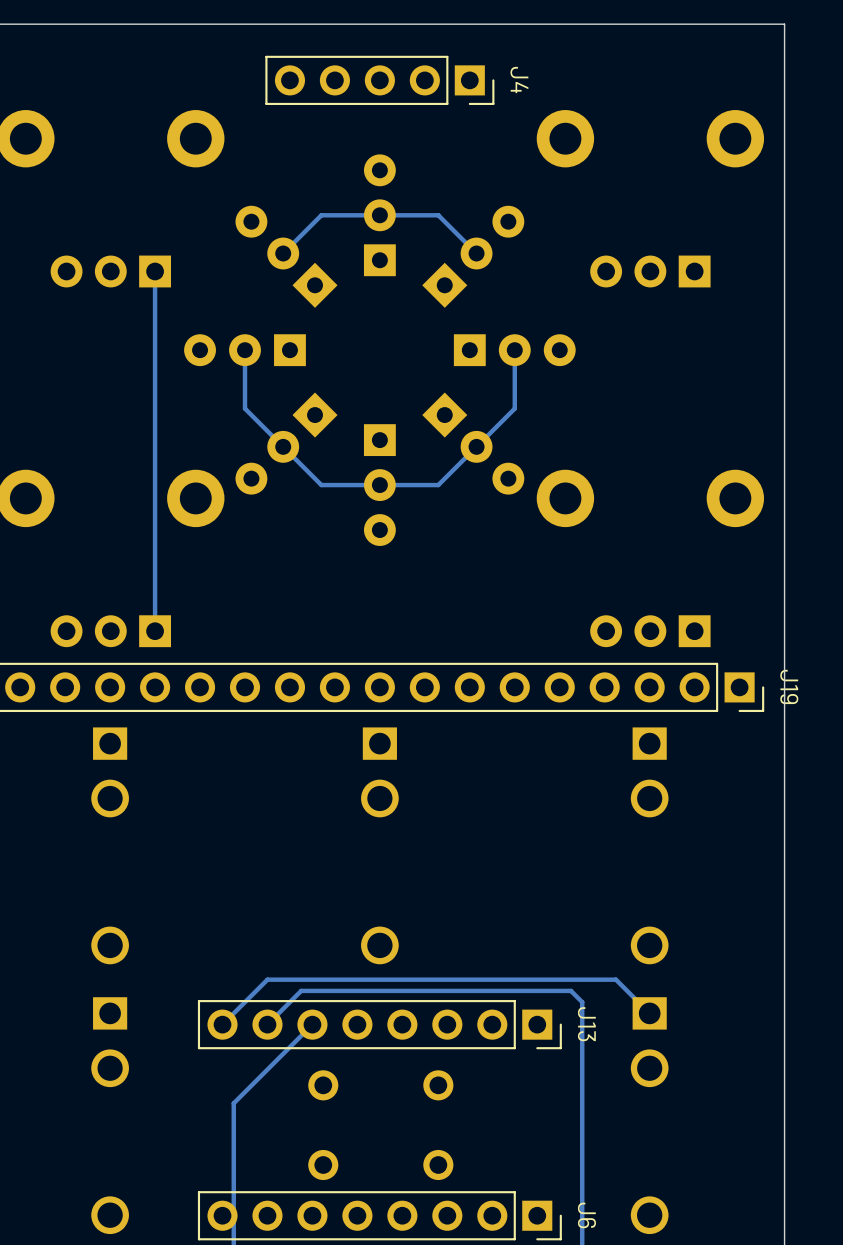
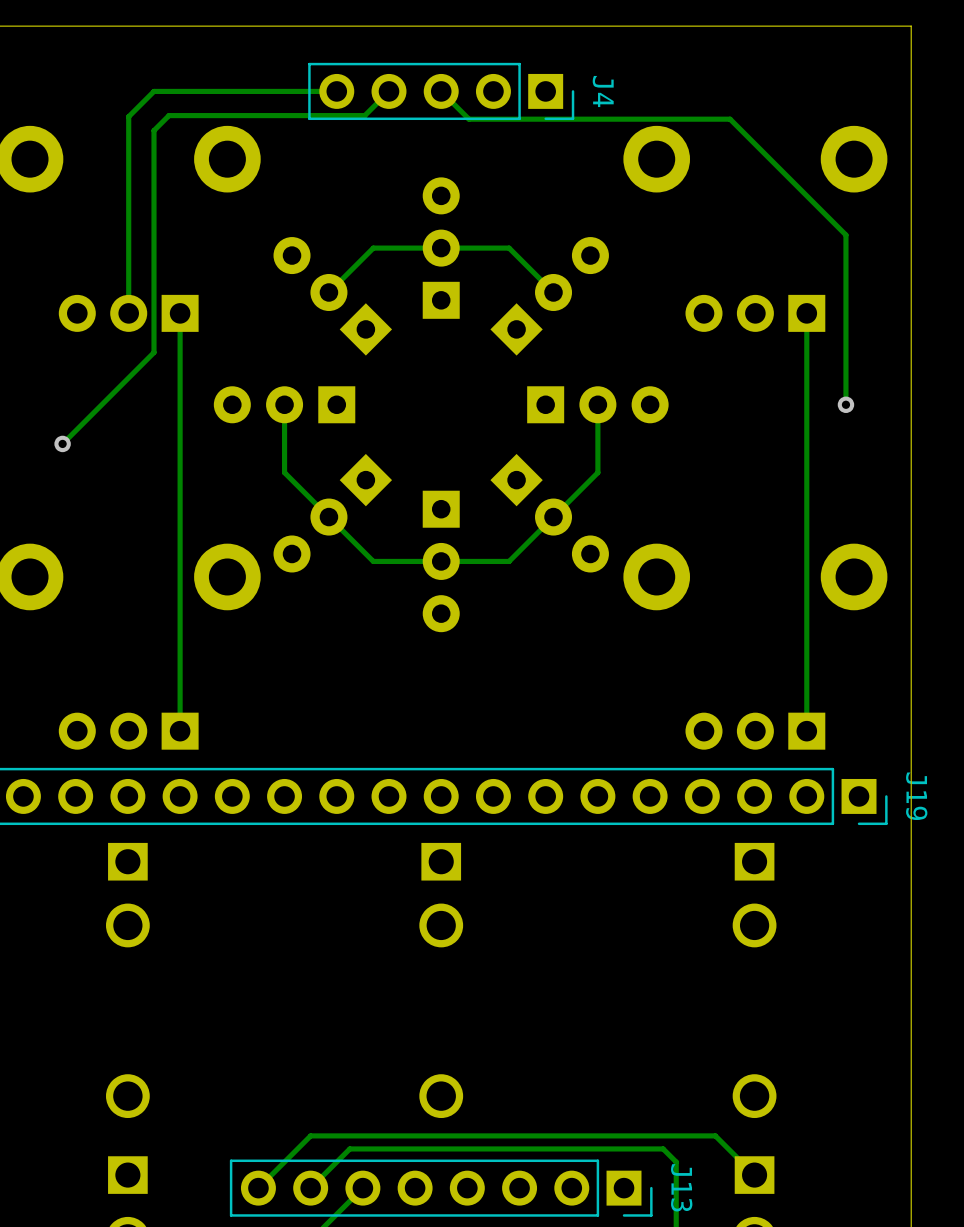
track: none -> (336, 91) (154, 91) (128, 116) (128, 313)
track: none -> (389, 91) (364, 115) (169, 115) (154, 130) (154, 352) (62, 443)
track: none -> (441, 91) (468, 119) (730, 119) (845, 235) (845, 404)
track: none -> (806, 313) (806, 731)
via: none -> (845, 404)
via: none -> (62, 443)

